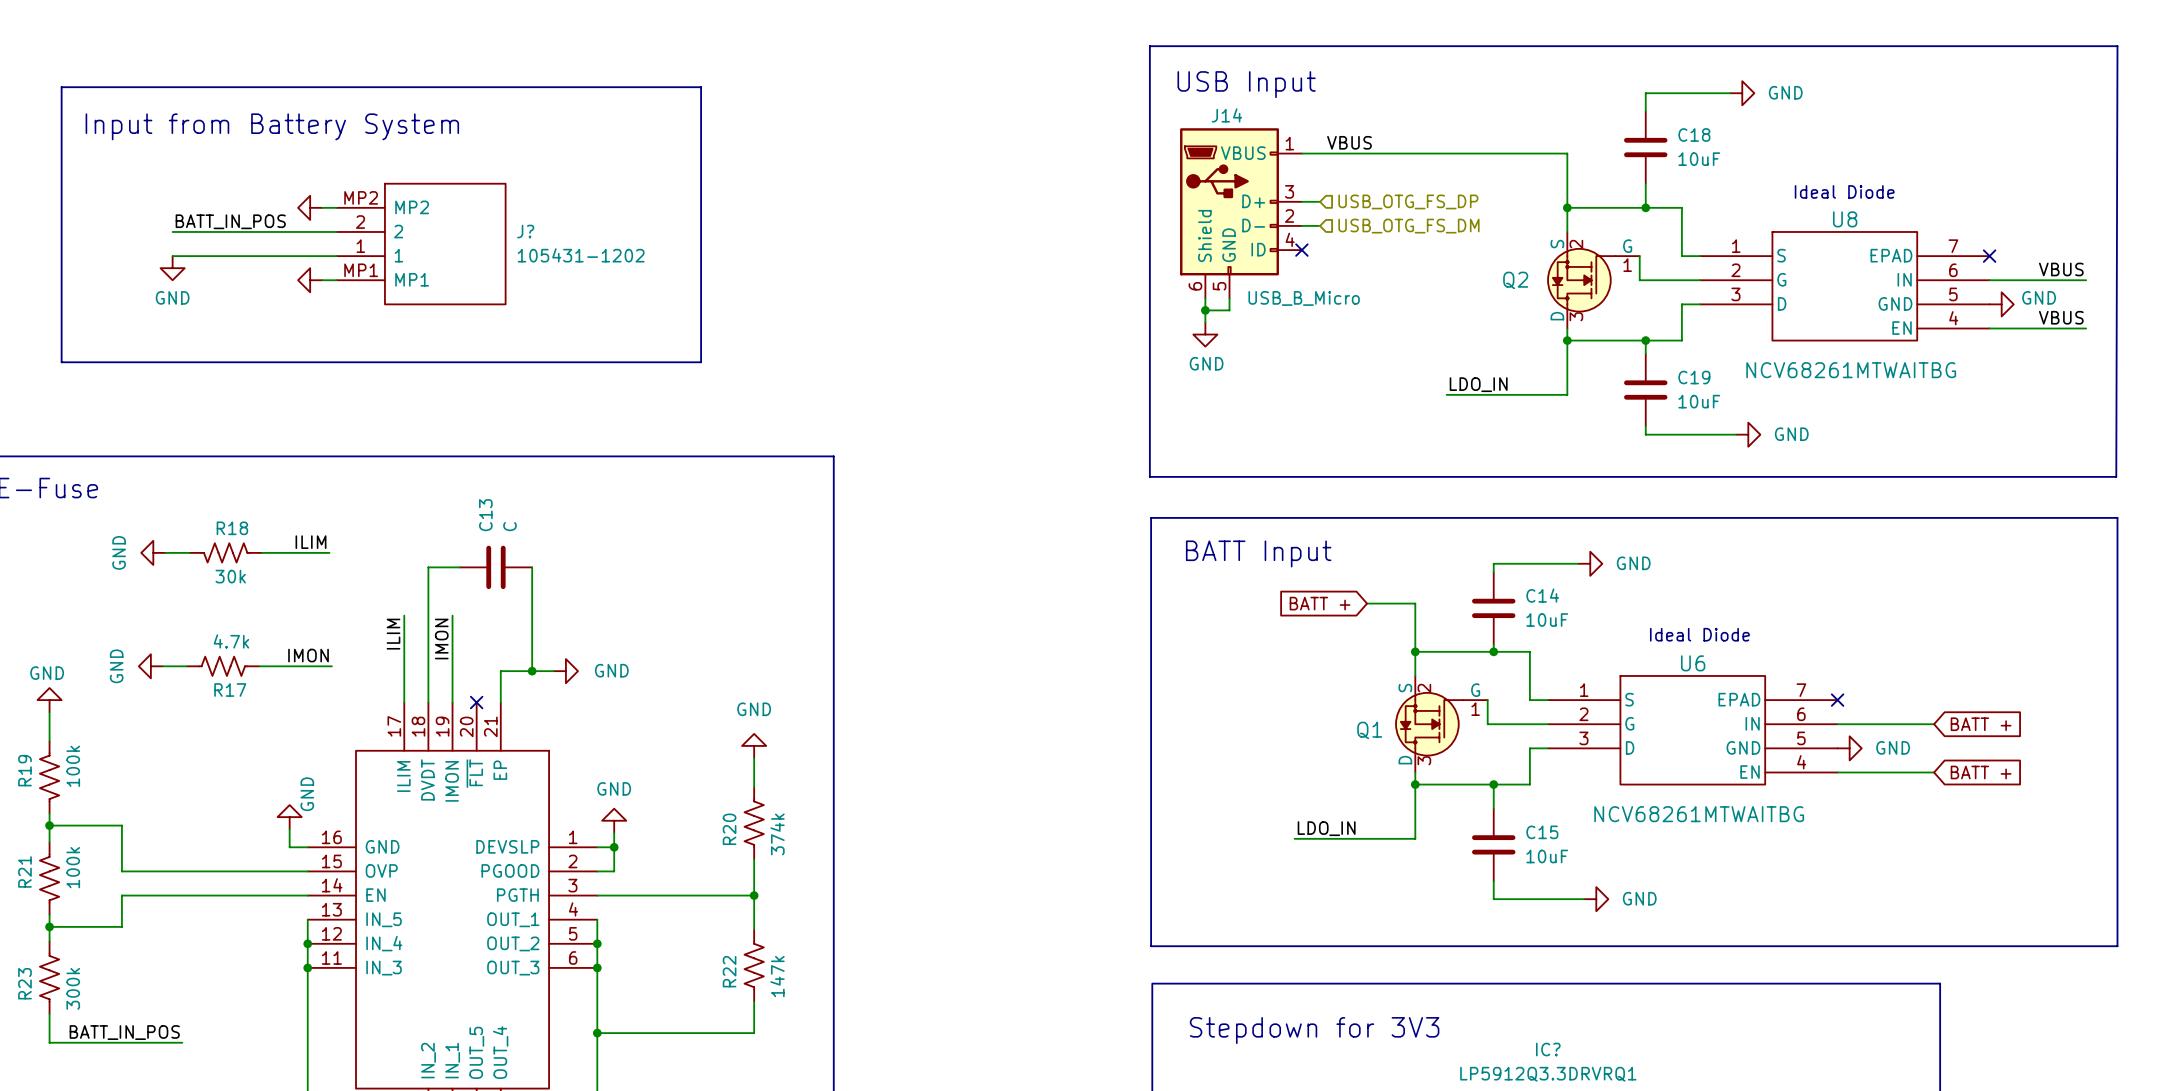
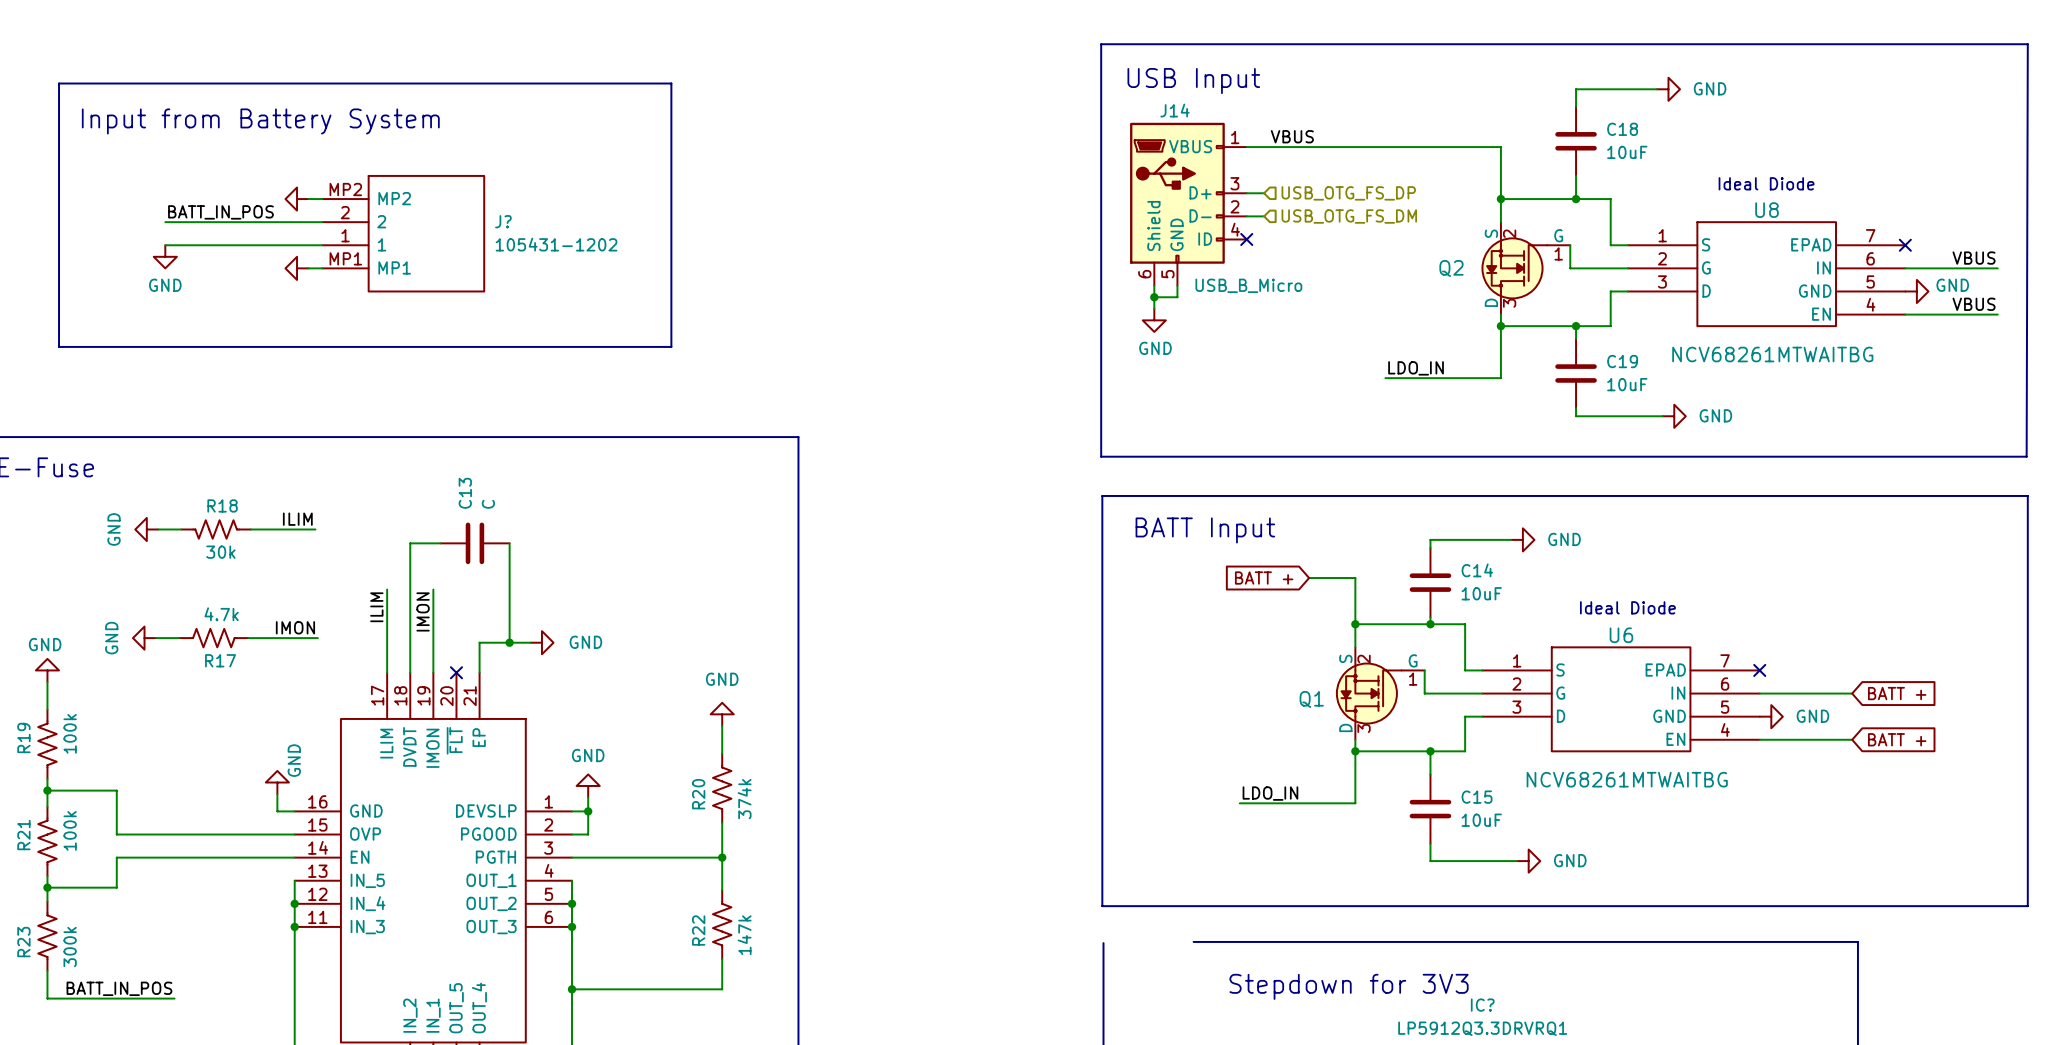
line: (1152, 983) (1246, 983) -> none
text position: Stepdown for 3V3 (1314, 1030) -> Stepdown for 3V3 (1349, 986)

